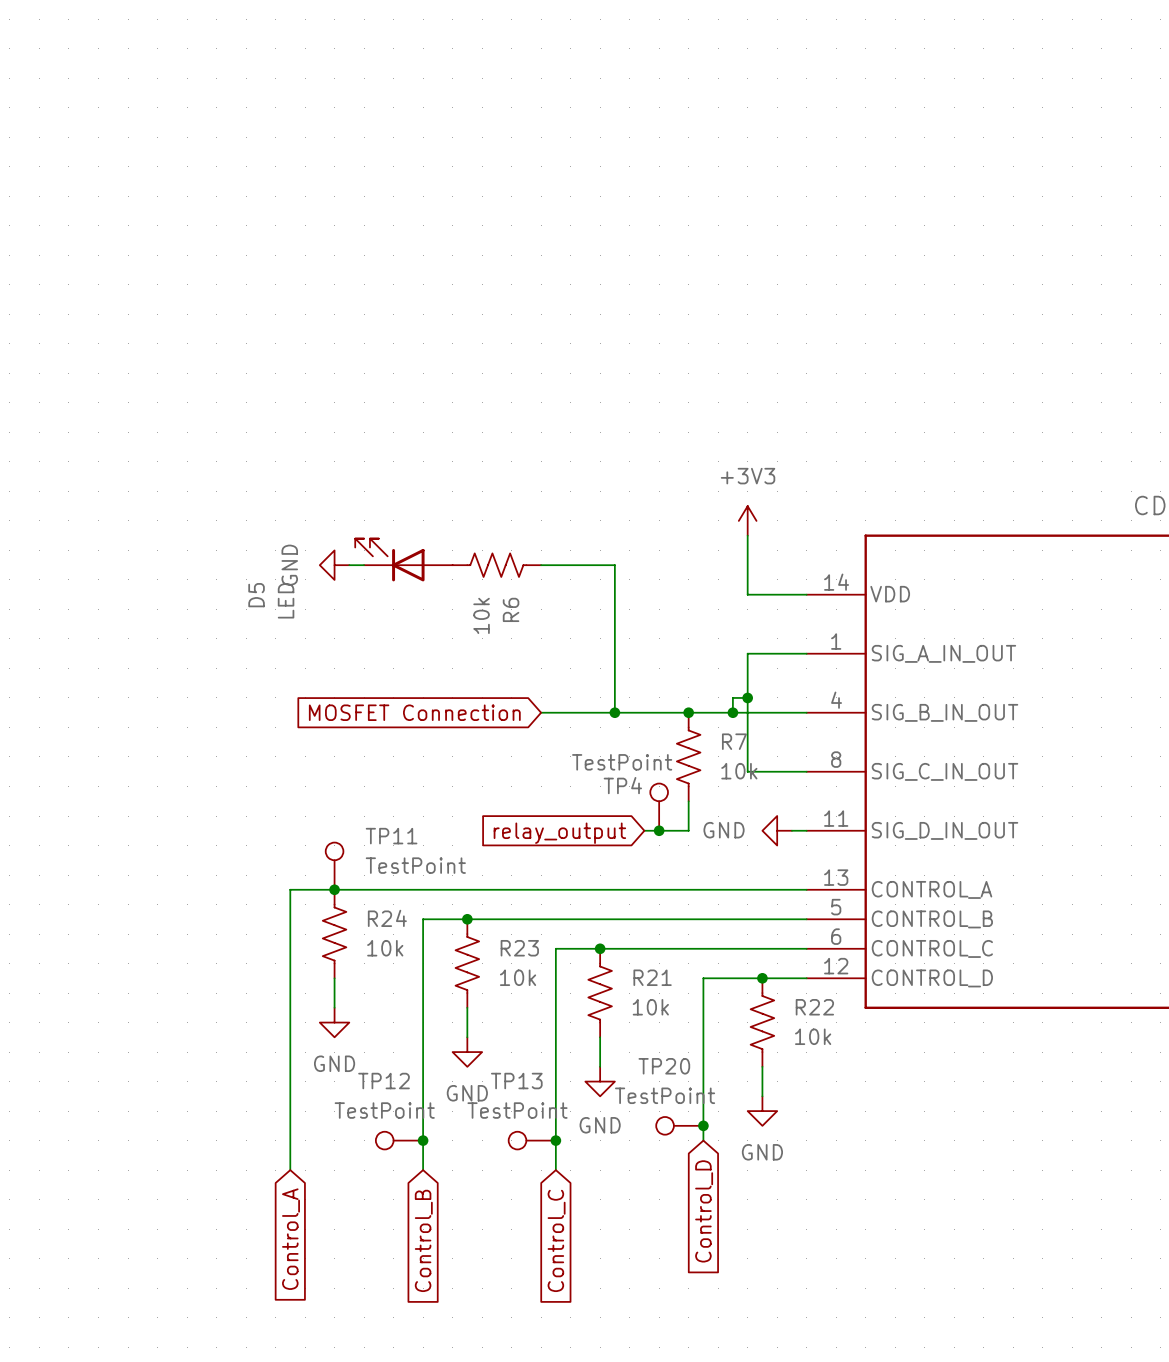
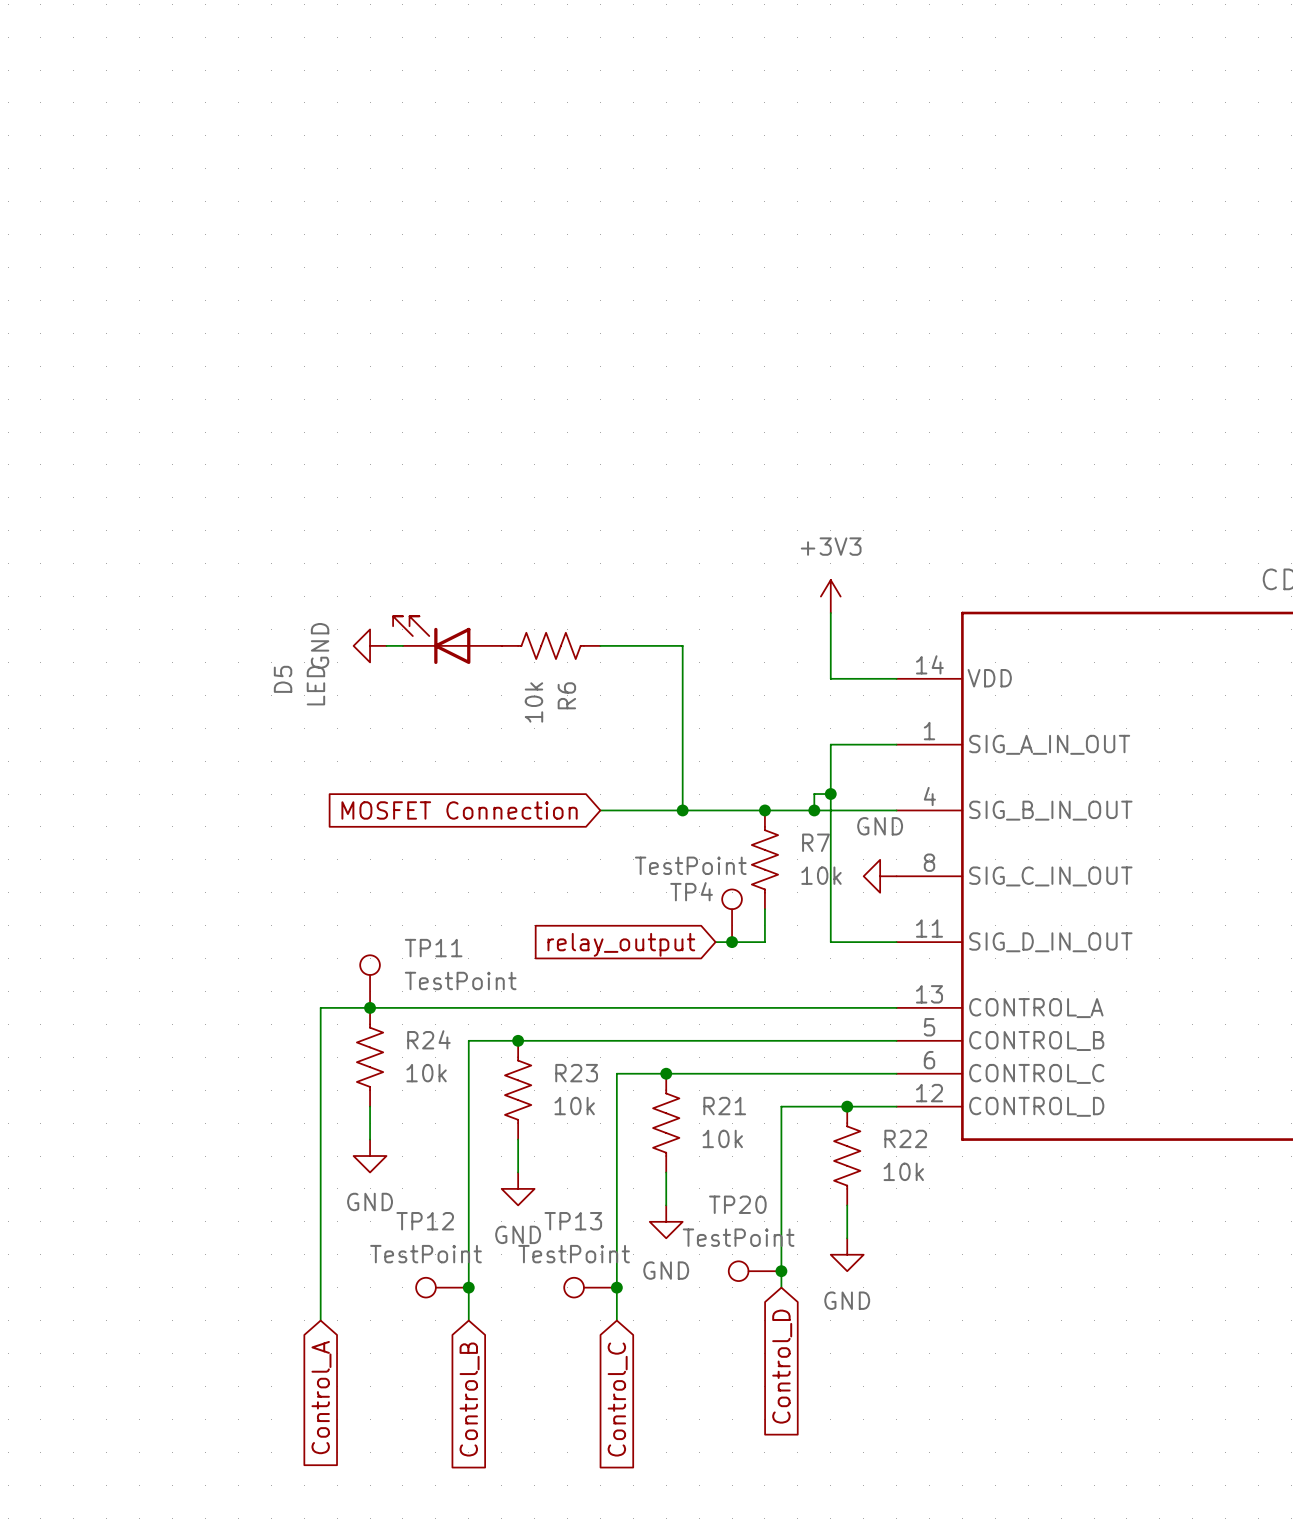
wire: (747, 771) (806, 771) -> (830, 876) (830, 942) (880, 942)
power symbol text position: GND (724, 830) -> GND (880, 826)
power symbol position: GND (777, 830) -> GND (880, 876)

